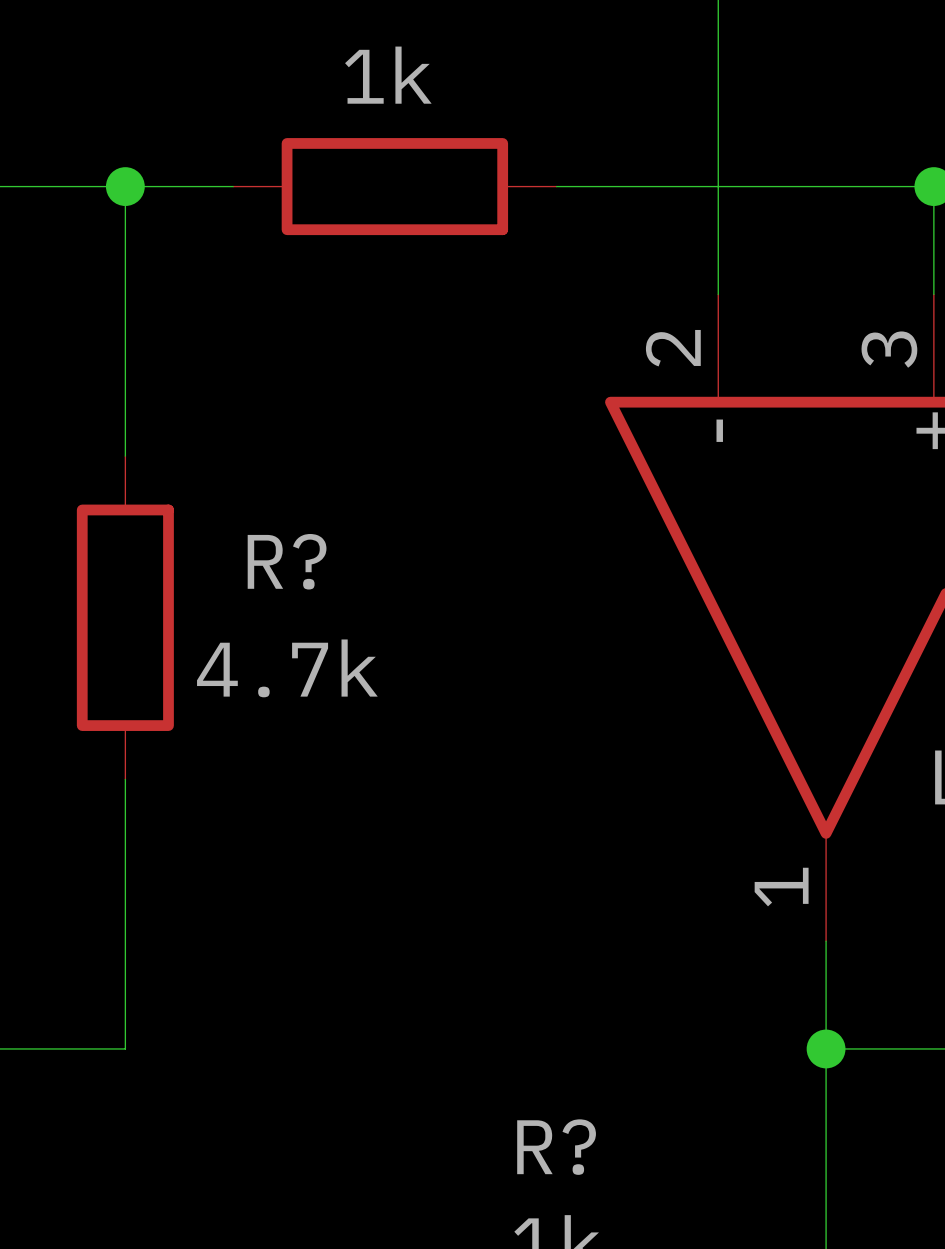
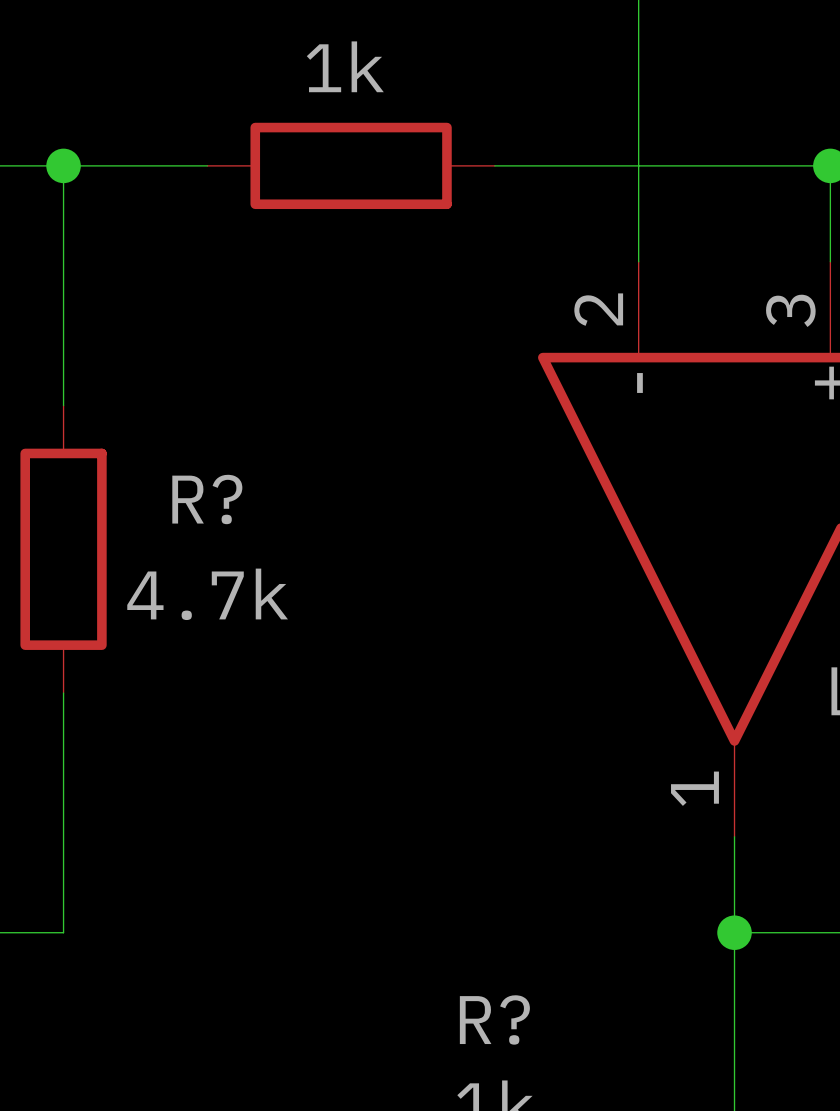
wire: (125, 186) (125, 456) -> (63, 165) (63, 405)
junction position: (125, 186) -> (63, 165)
R? position: (125, 617) -> (63, 549)
wire: (125, 779) (125, 1048) (71, 1048) -> (63, 693) (63, 932)

